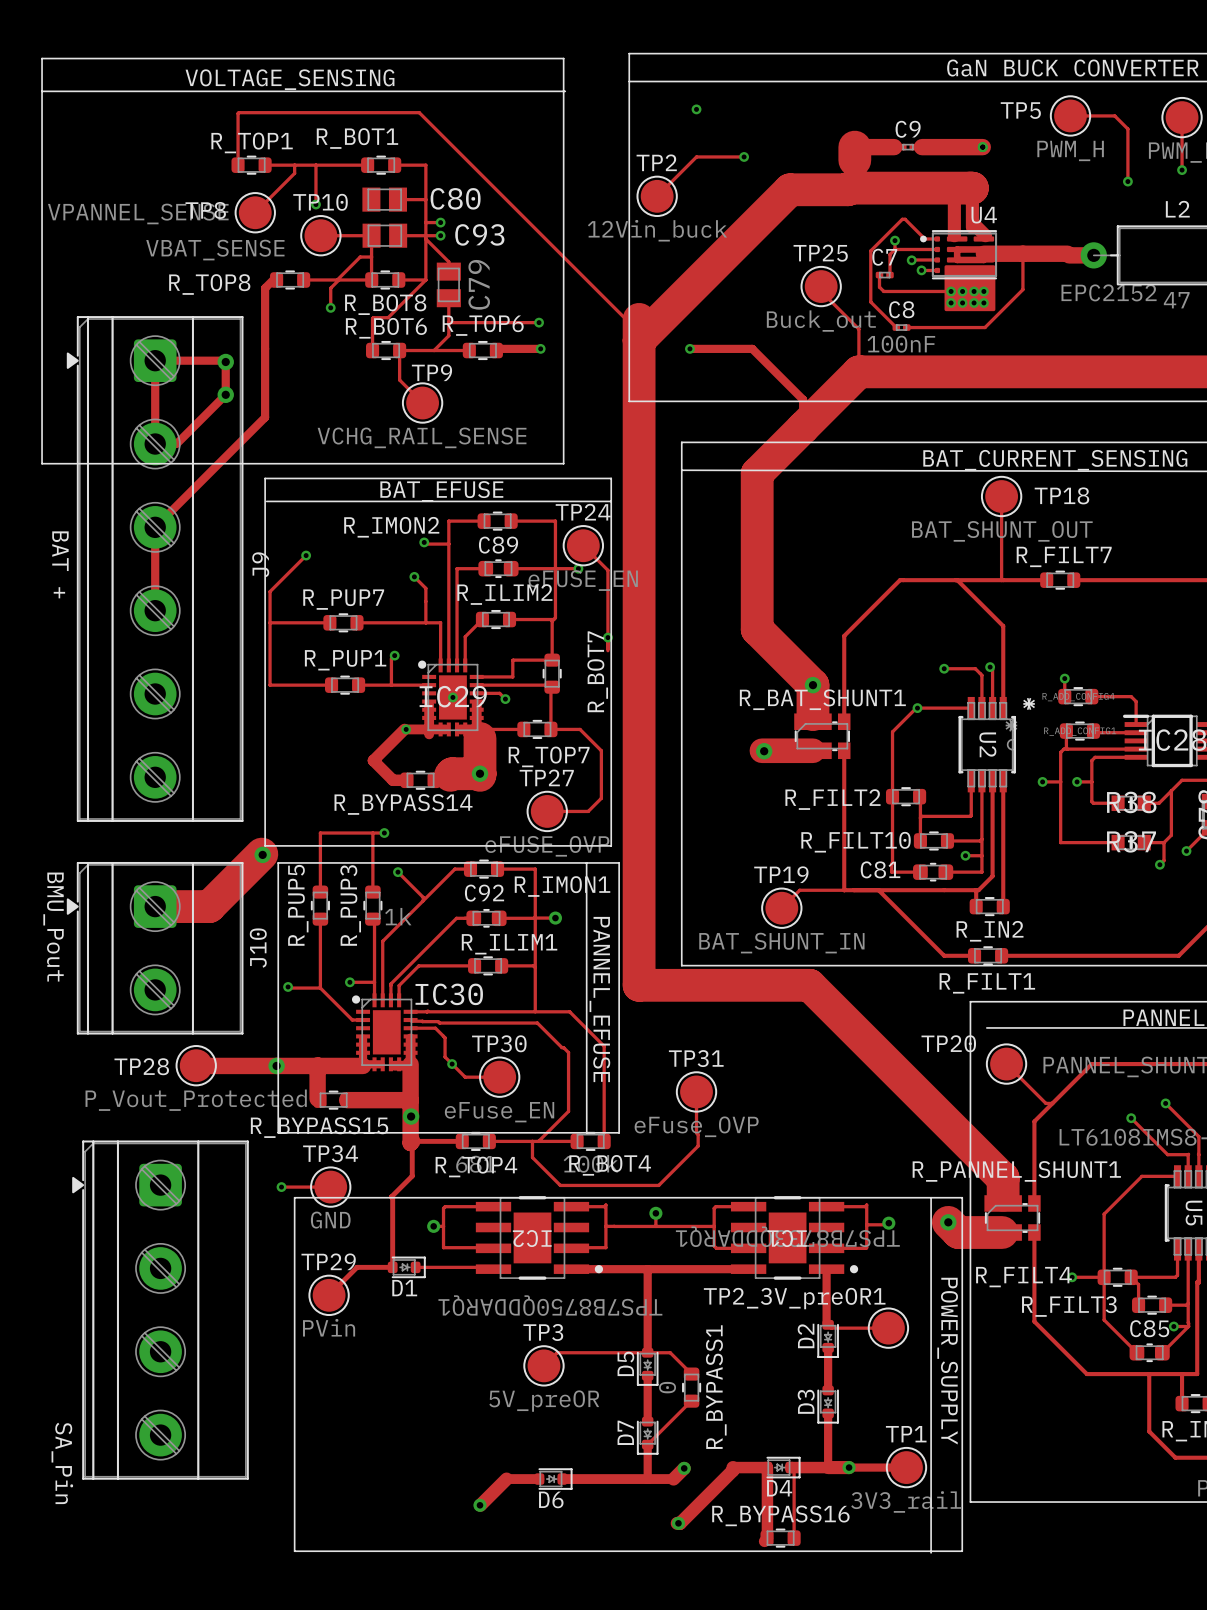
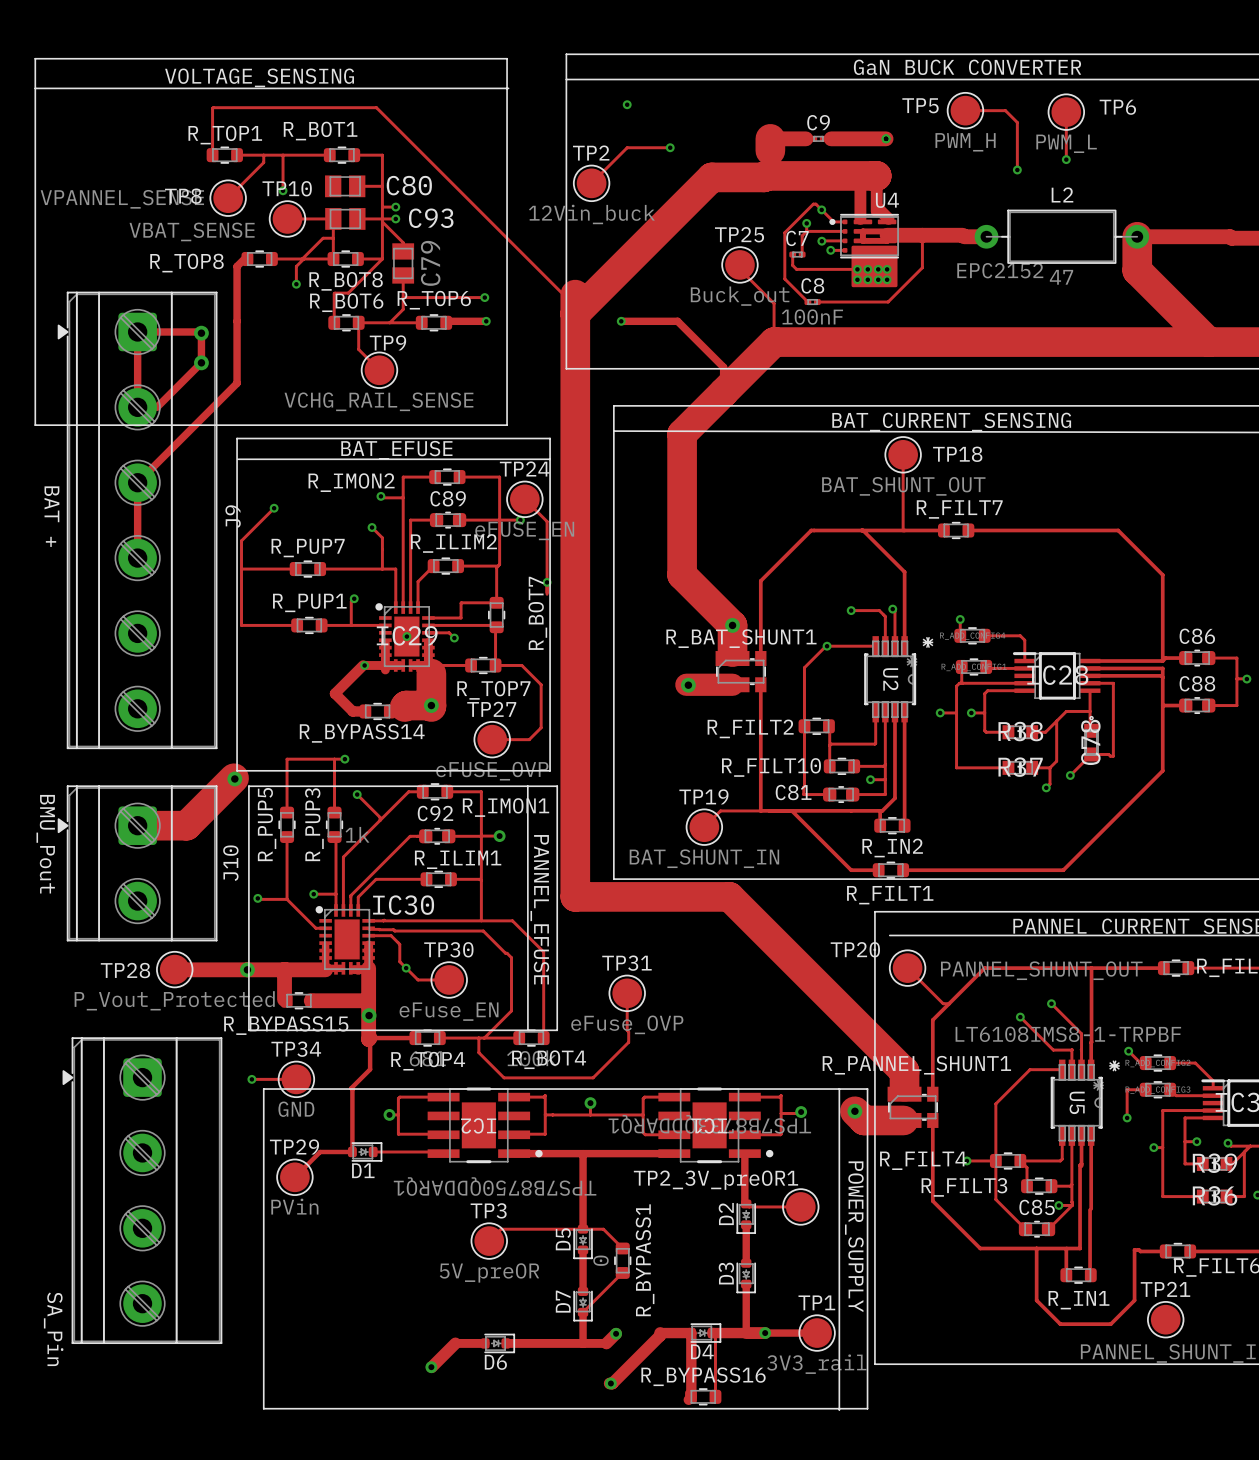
via: none -> (821, 209)

